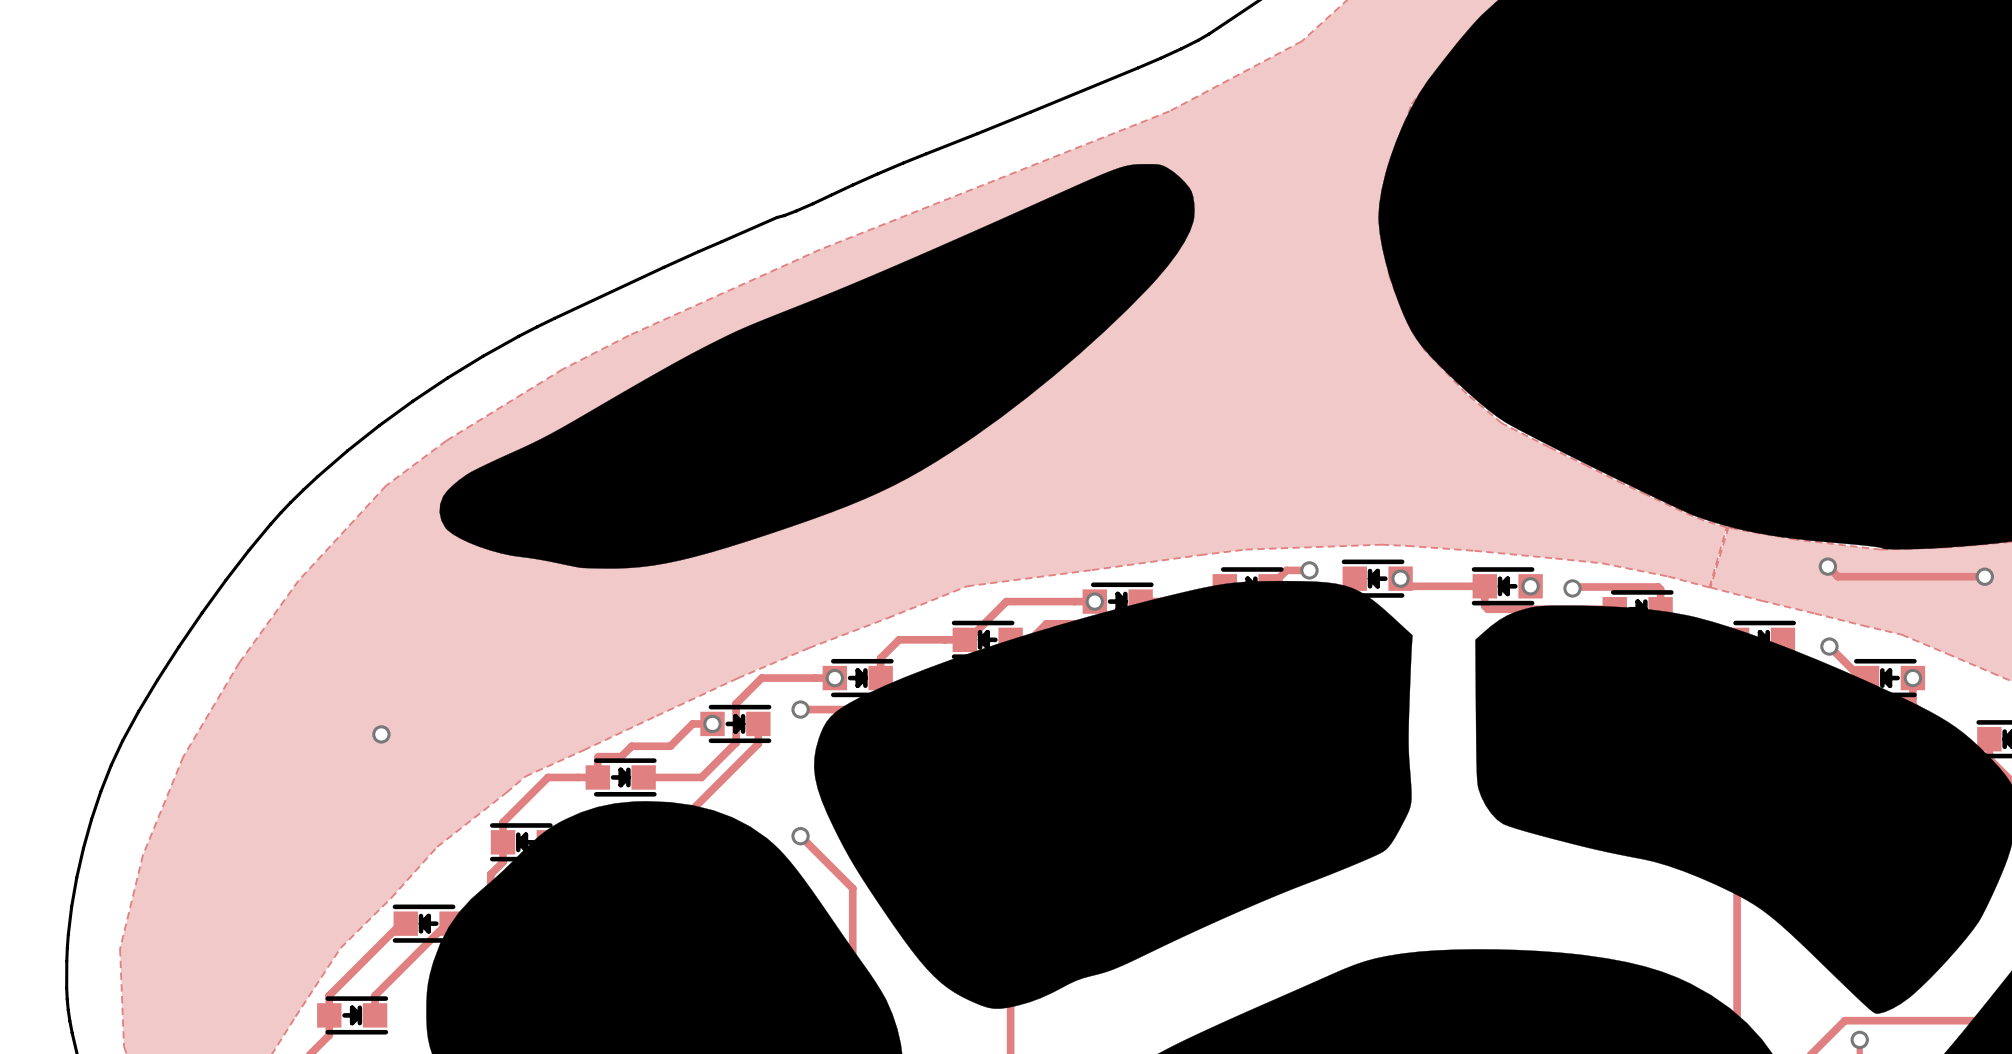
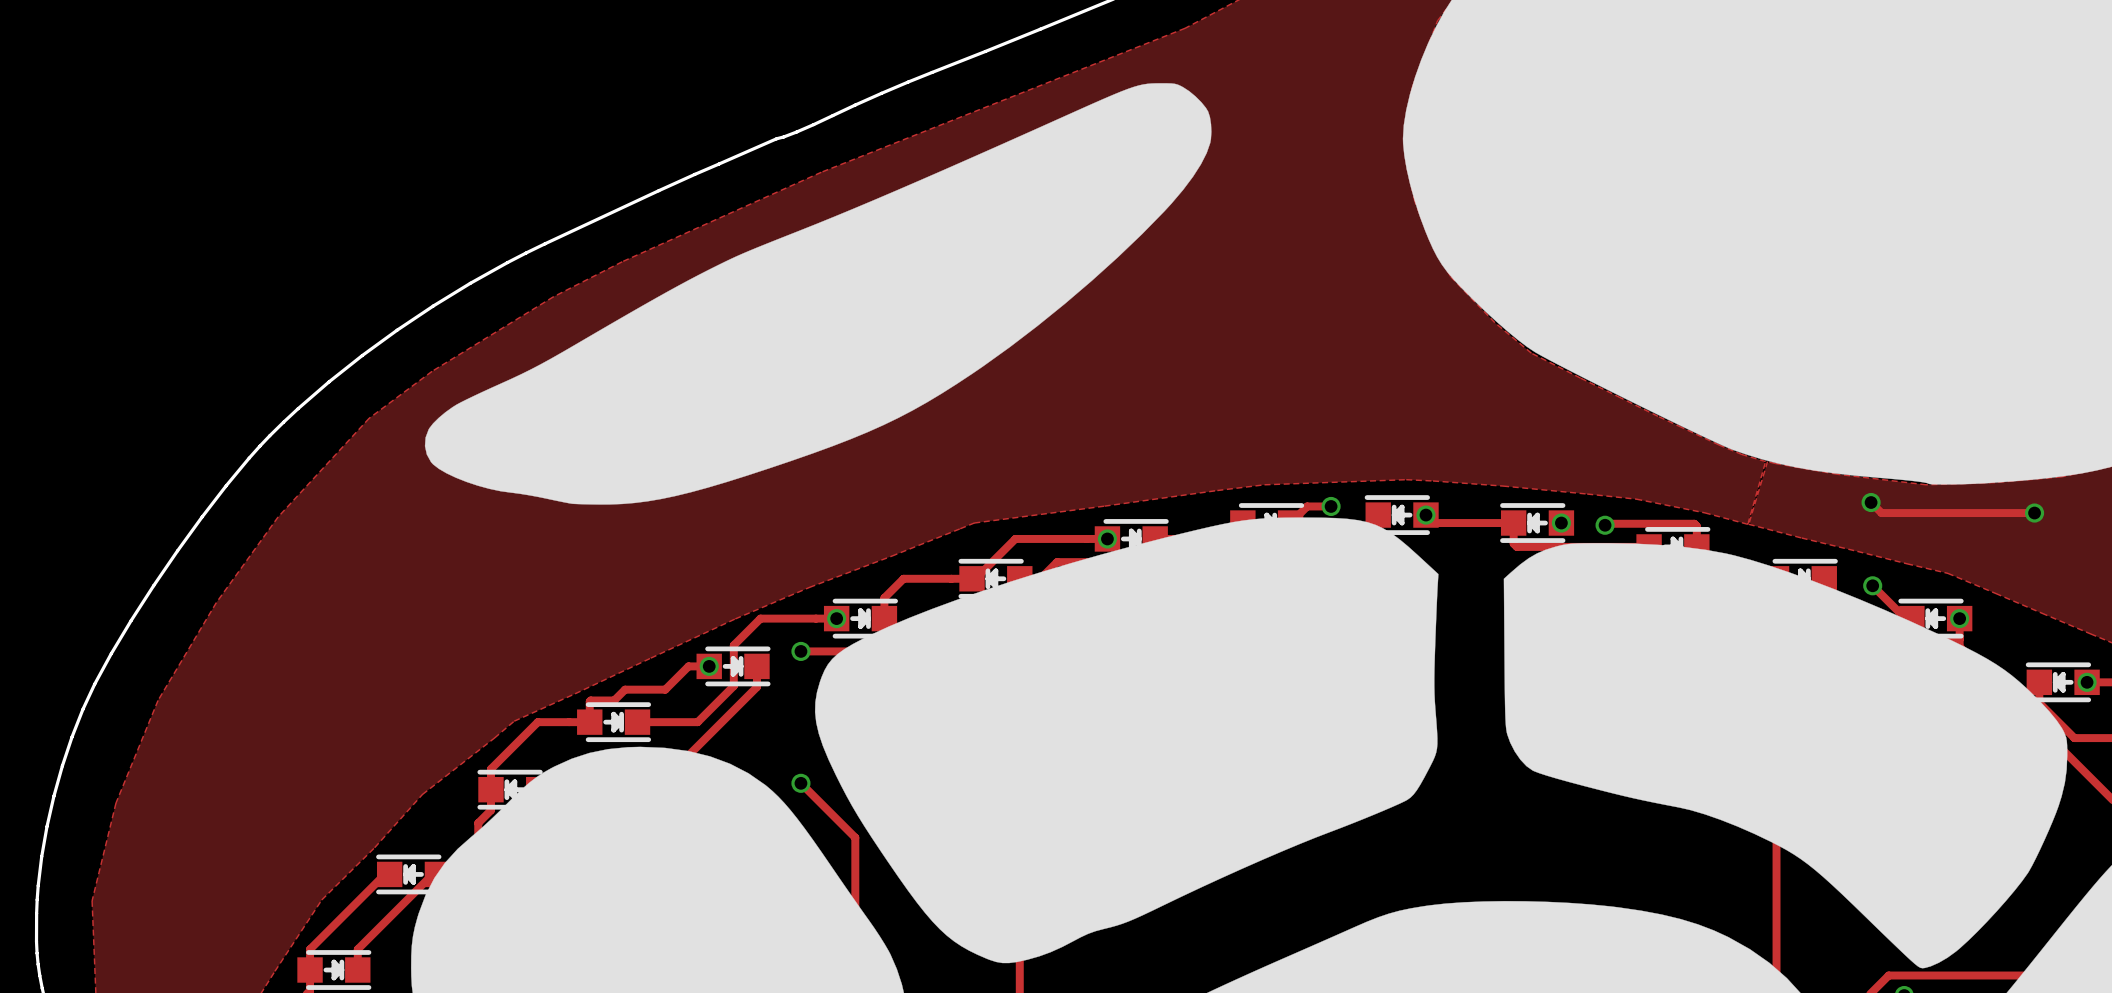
via: (381, 734) -> none

